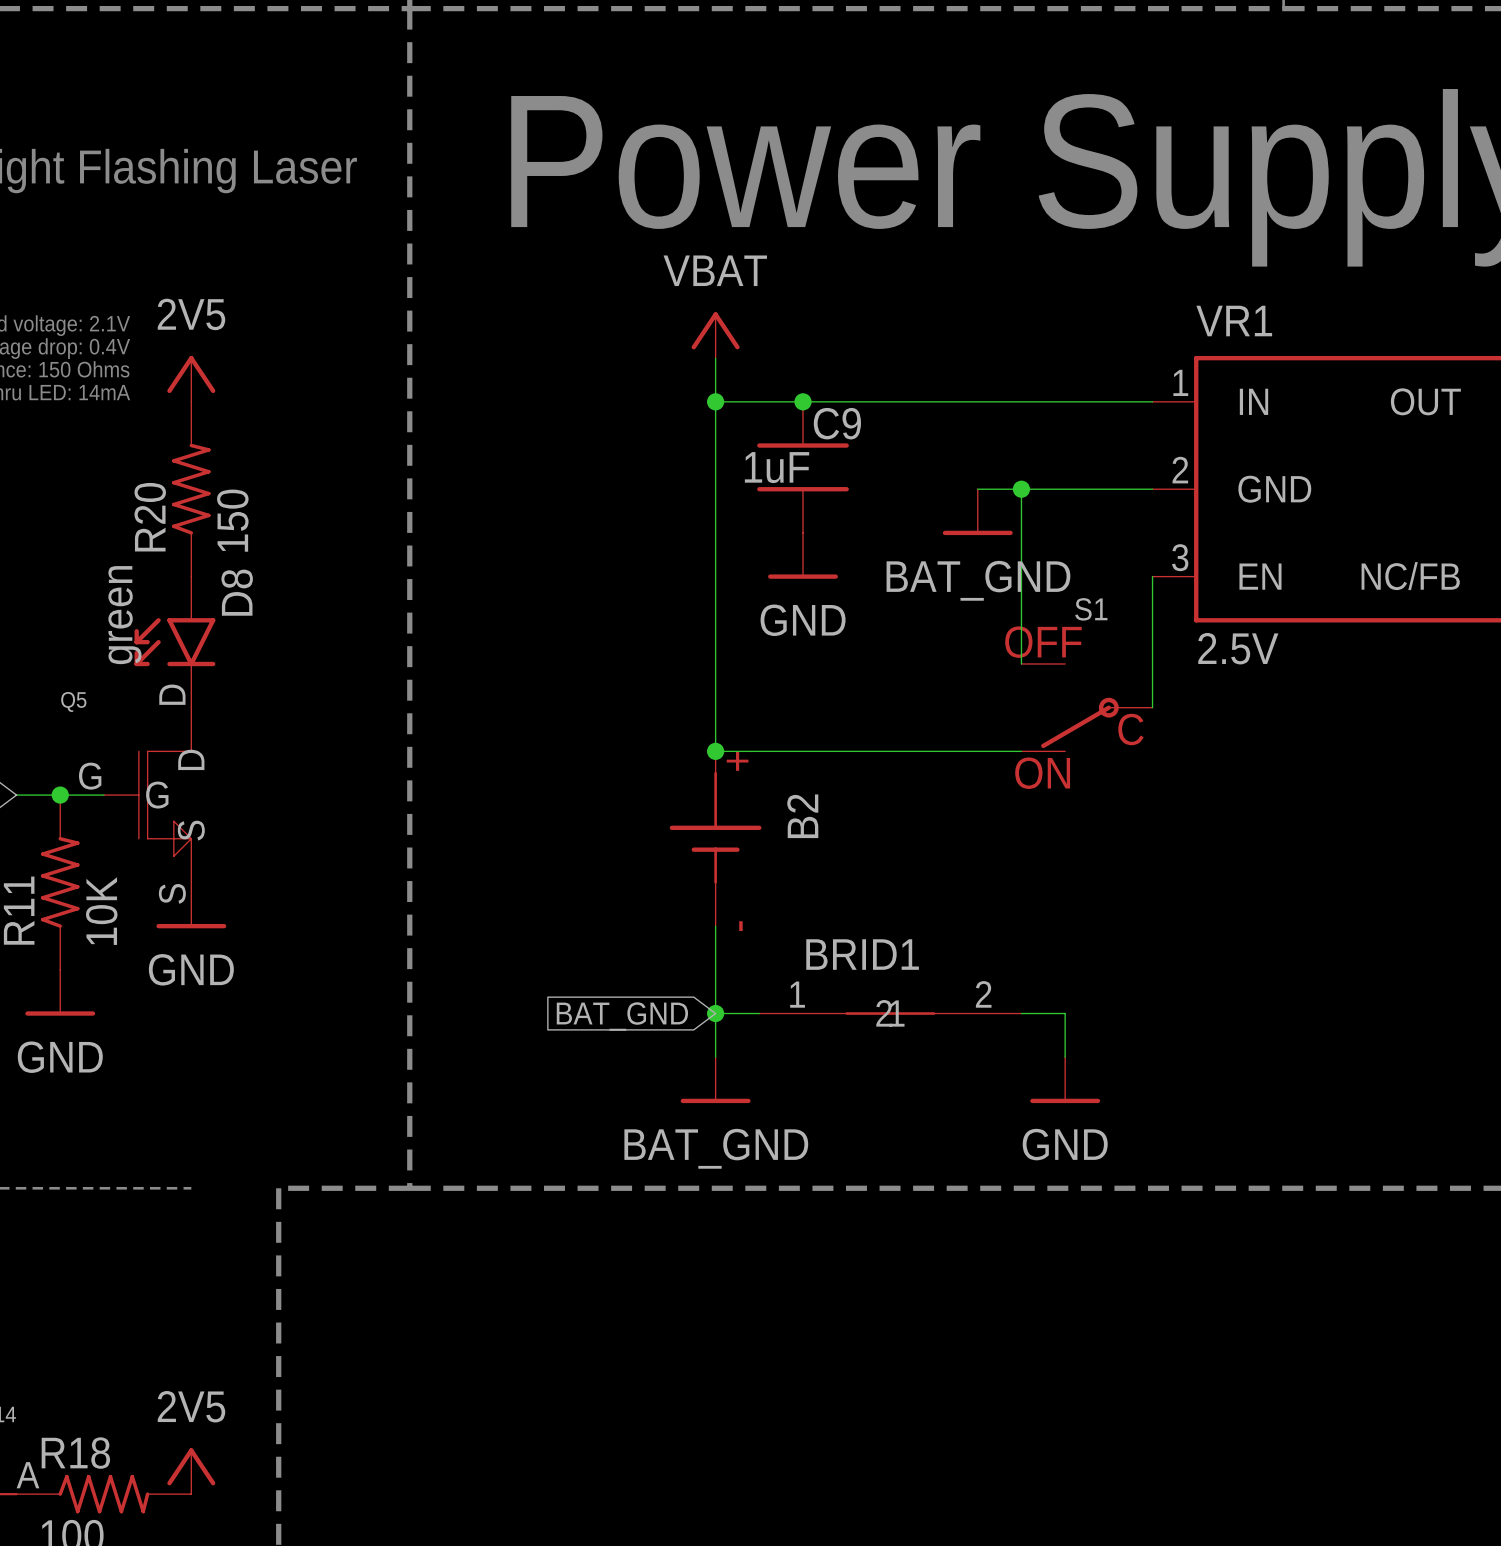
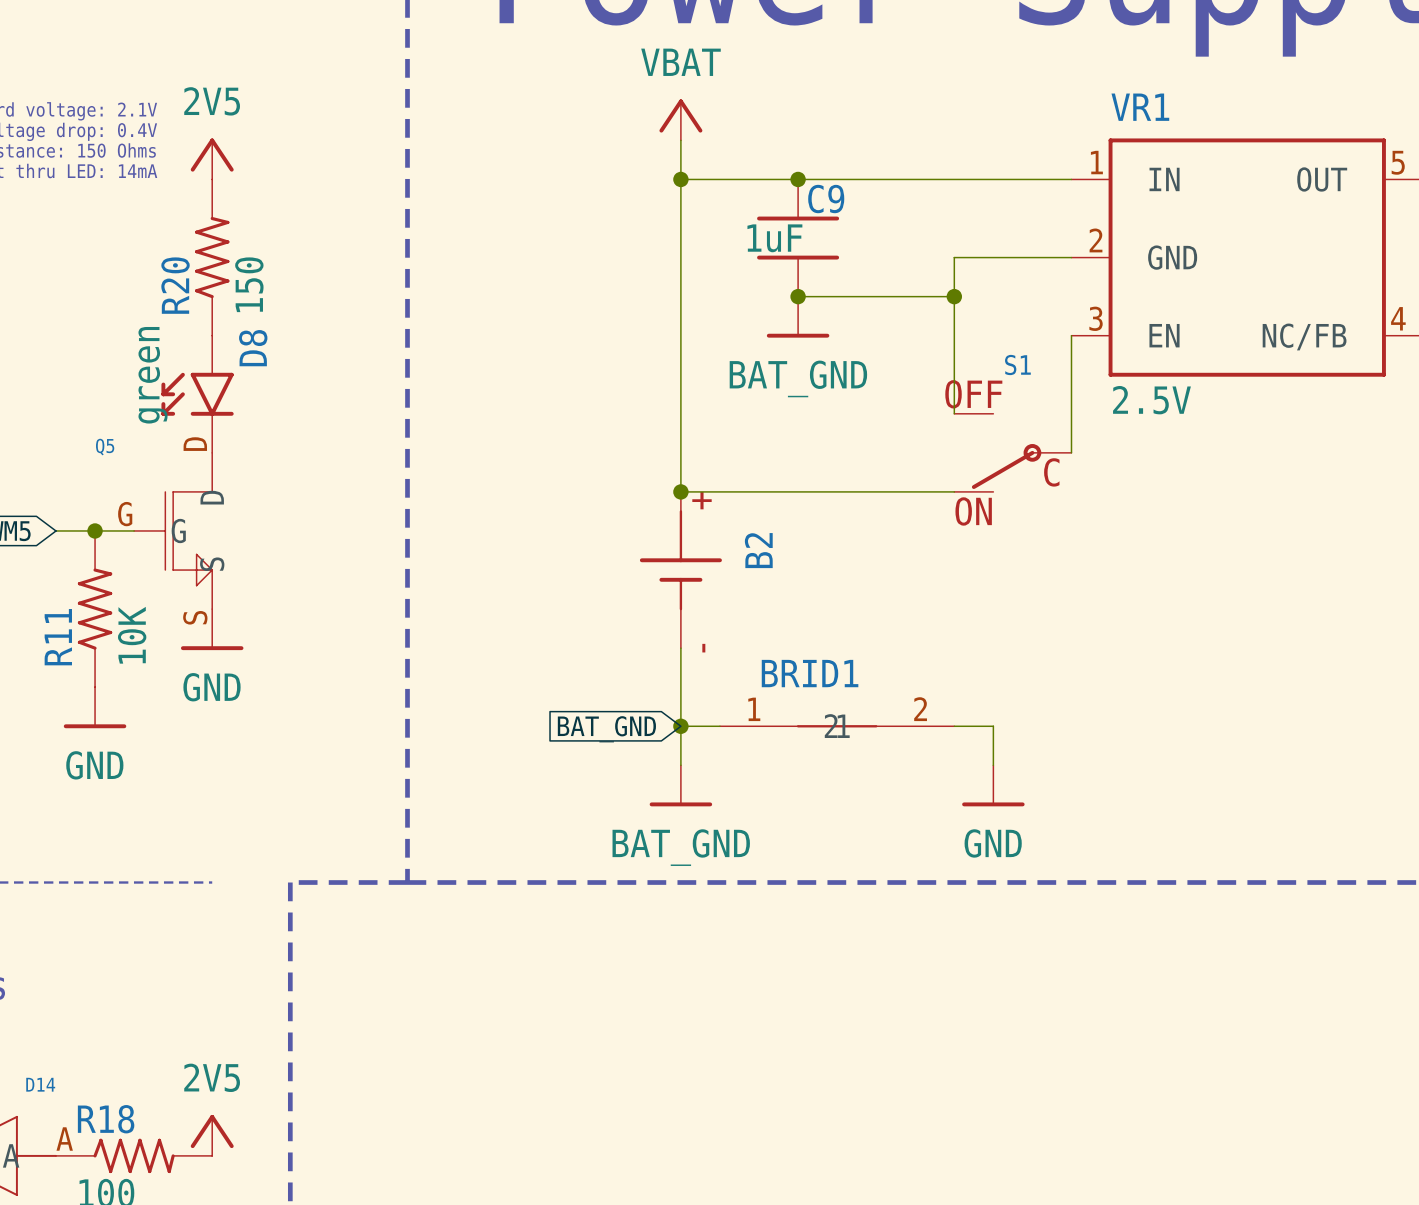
junction position: (803, 401) -> (798, 179)
C9 position: (803, 467) -> (798, 238)
wire: (977, 489) (1021, 489) -> none
junction position: (1021, 489) -> (954, 296)
power symbol position: BAT_GND (977, 512) -> BAT_GND (798, 317)
wire: none -> (798, 296) (954, 296)
junction: none -> (798, 296)
power symbol: GND (803, 555) -> none

